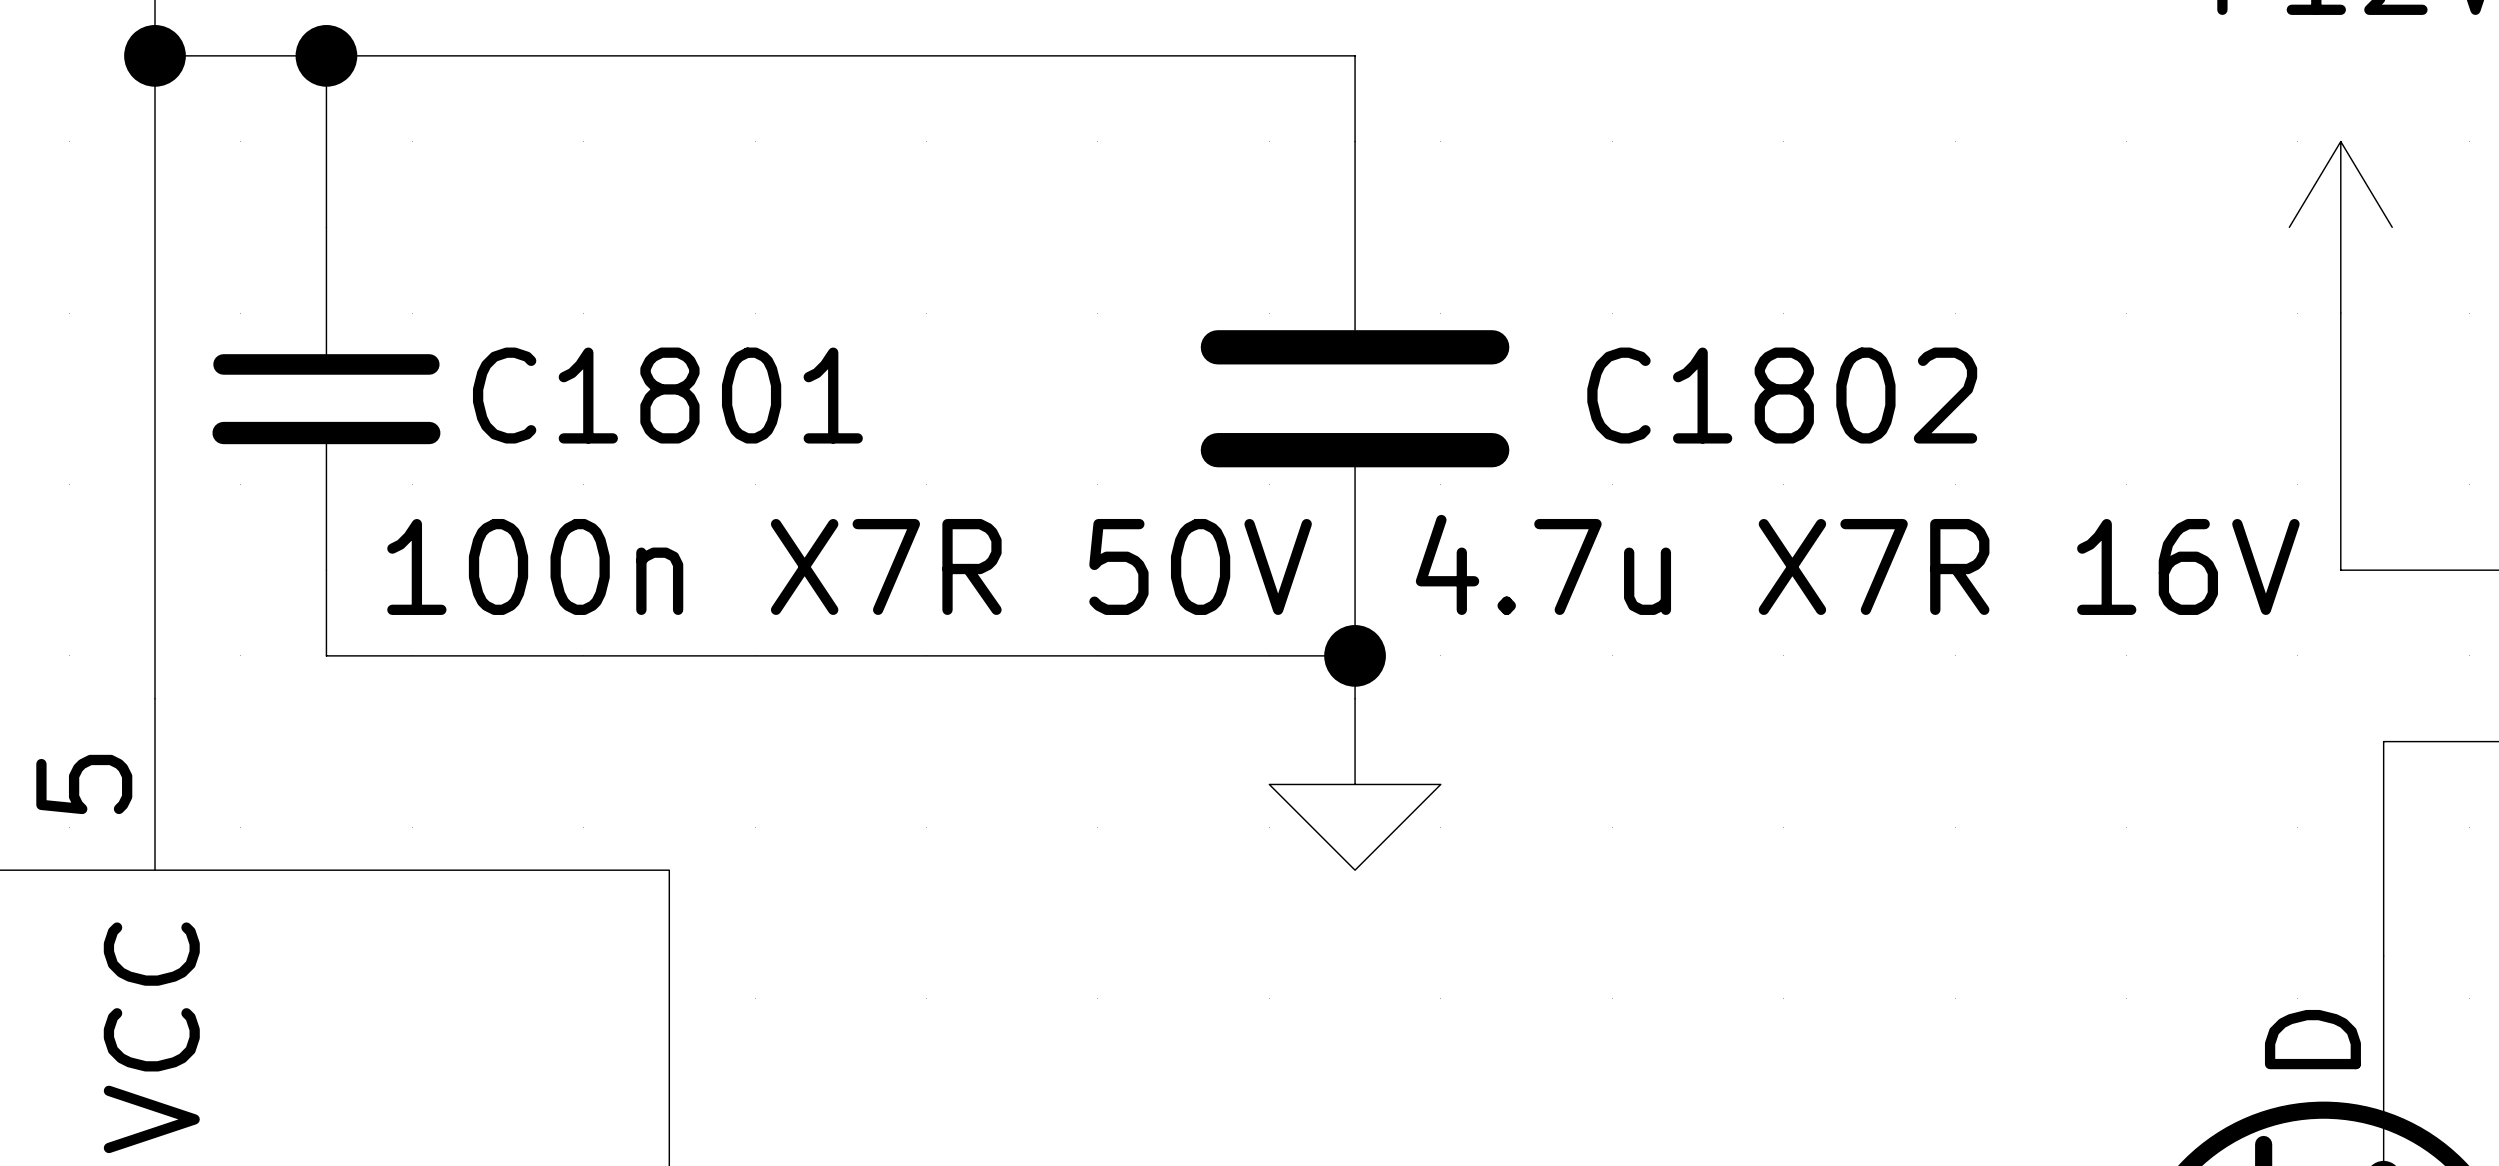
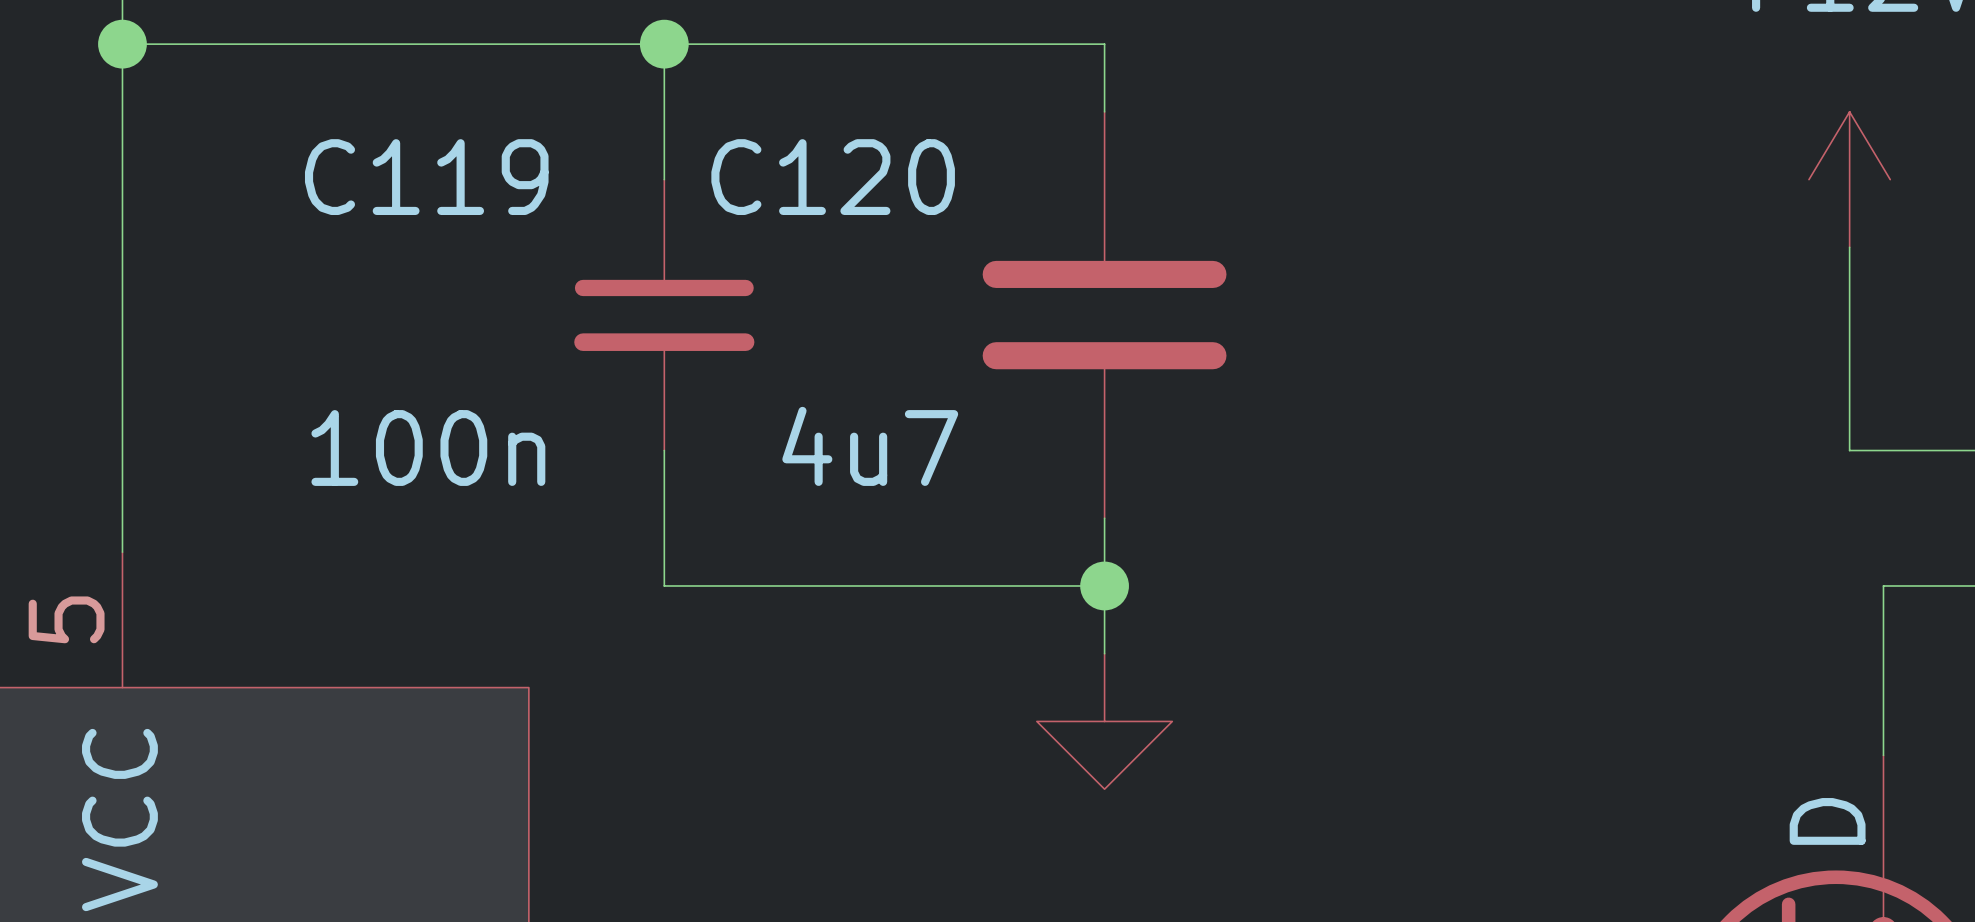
wire: (326, 55) (326, 227) -> (664, 44) (664, 179)
junction: (326, 55) -> none
junction: none -> (664, 44)
wire: (1355, 55) (1355, 141) -> (1070, 44) (1104, 44) (1104, 111)
C1802 name: C1802 (1782, 395) -> C120 (833, 177)
C1801: 100n X7R 50V (326, 398) -> none
C119: none -> 100n (664, 315)
C1802 position: (1355, 398) -> (1104, 315)
C1802 value: 4.7u X7R 16V (1857, 564) -> 4u7 (870, 446)
wire: (326, 570) (326, 655) (1355, 655) (1355, 698) -> none
wire: none -> (664, 450) (664, 585) (1104, 585)
junction position: (1355, 655) -> (1104, 585)
wire: none -> (1104, 518) (1104, 653)
power symbol position: (1355, 784) -> (1104, 721)

